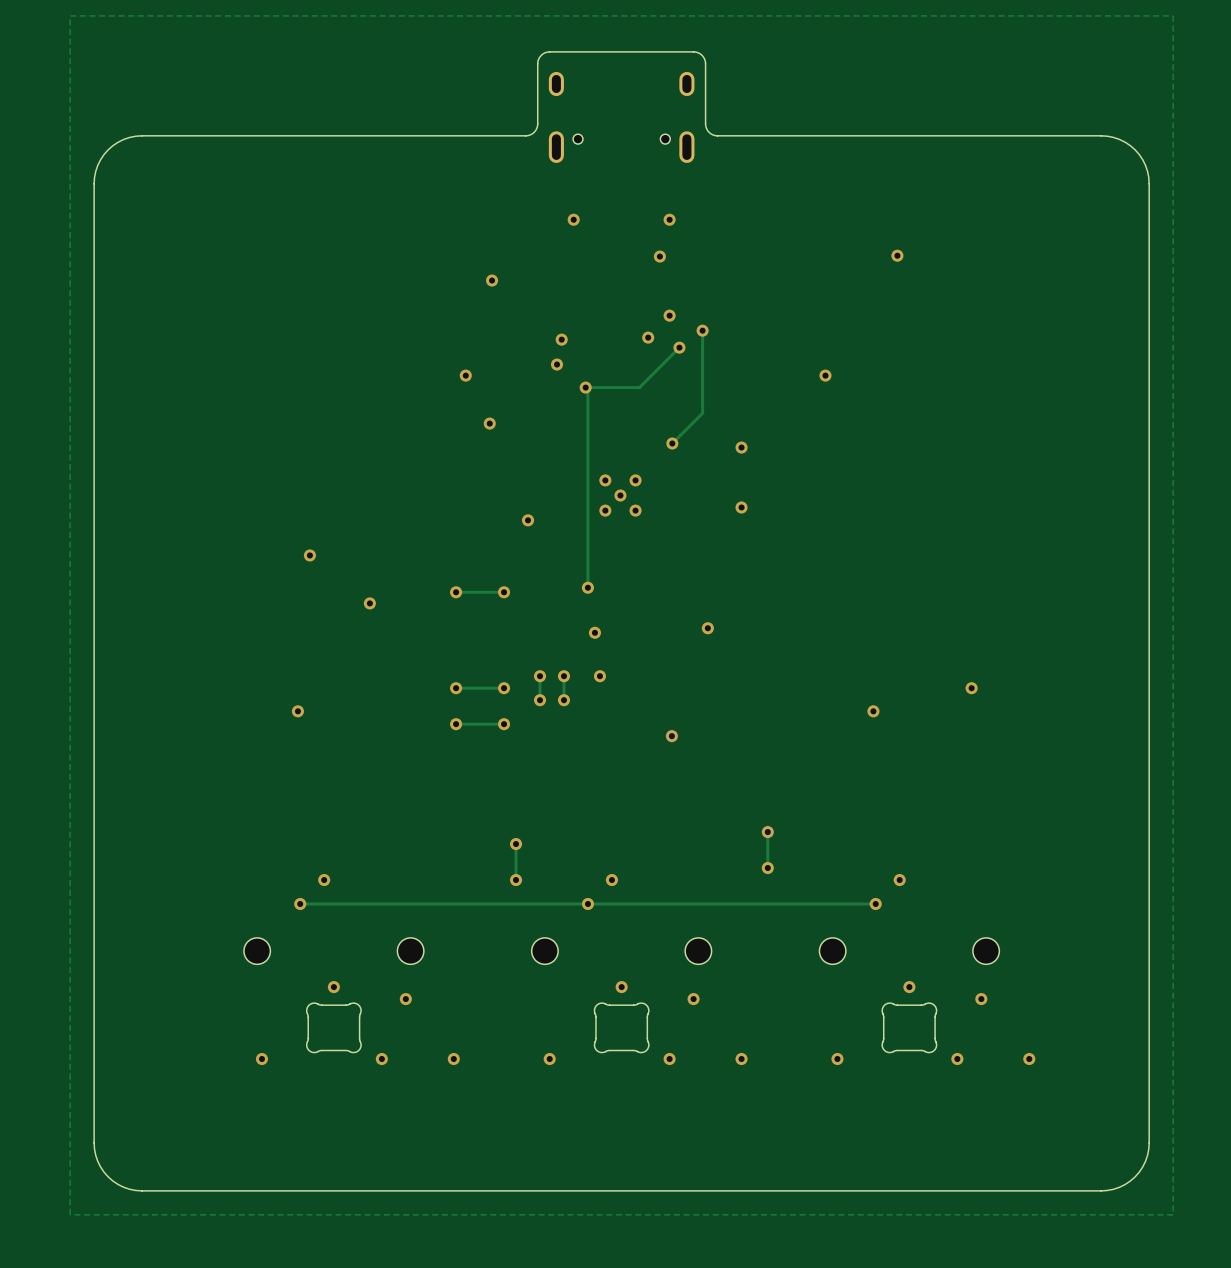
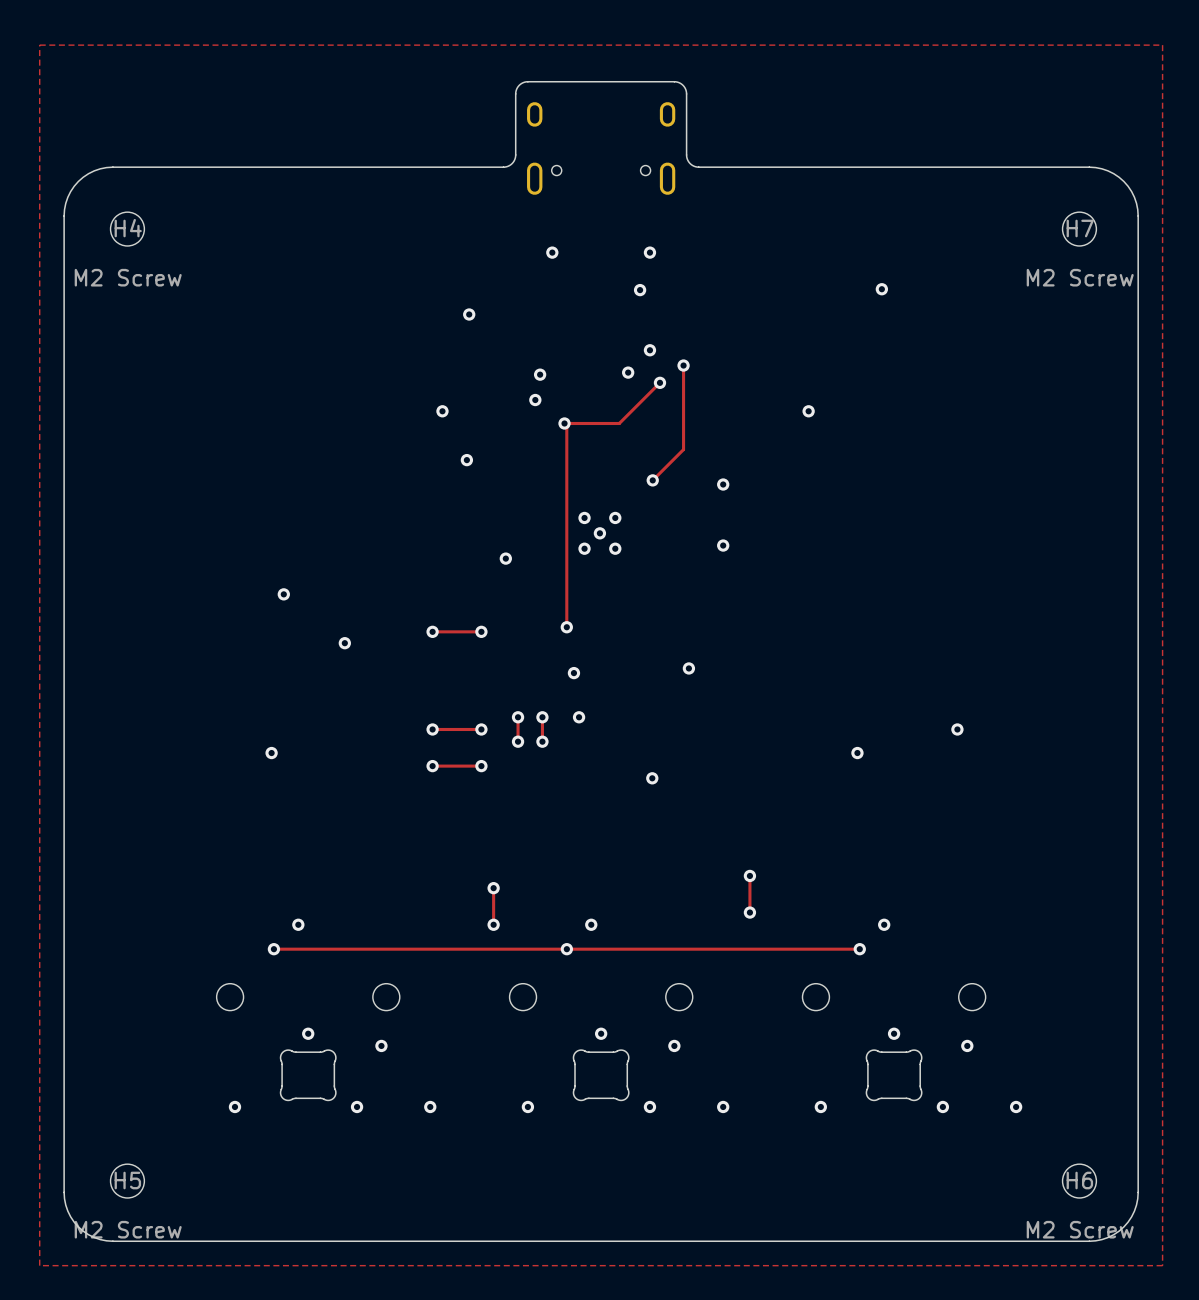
H4: none -> M2 Screw (127, 229)
H7: none -> M2 Screw (1079, 229)
H5: none -> M2 Screw (127, 1181)
H6: none -> M2 Screw (1079, 1181)

